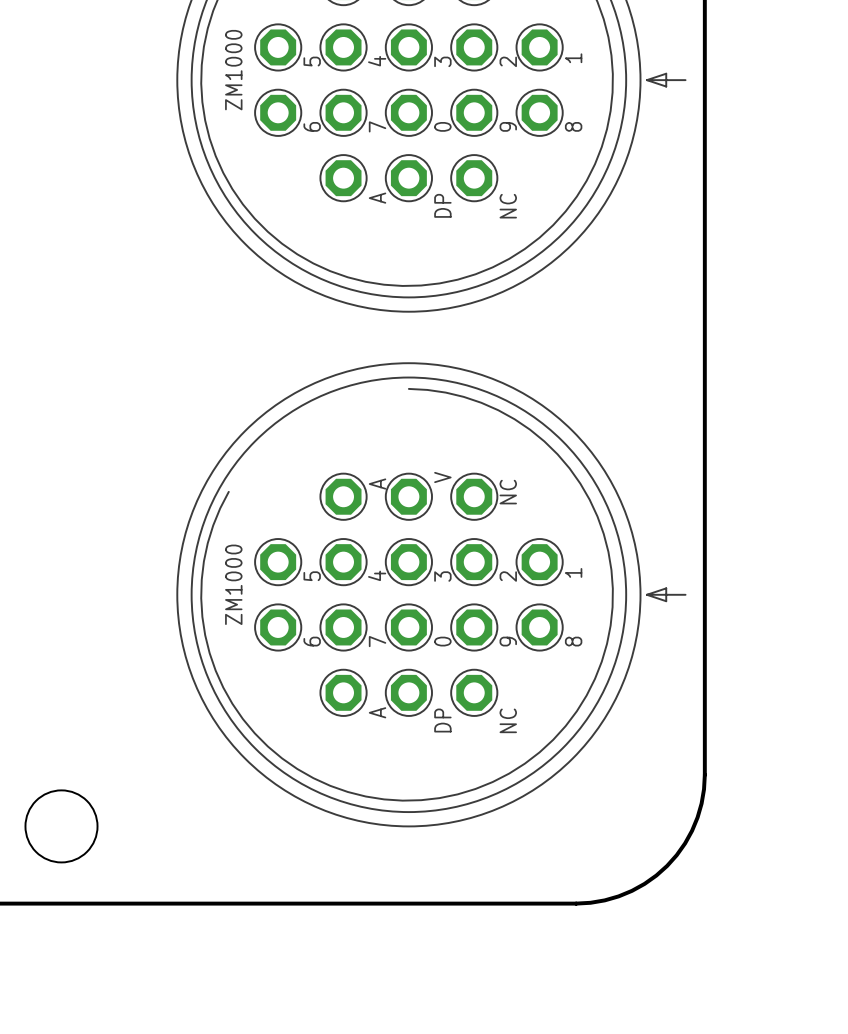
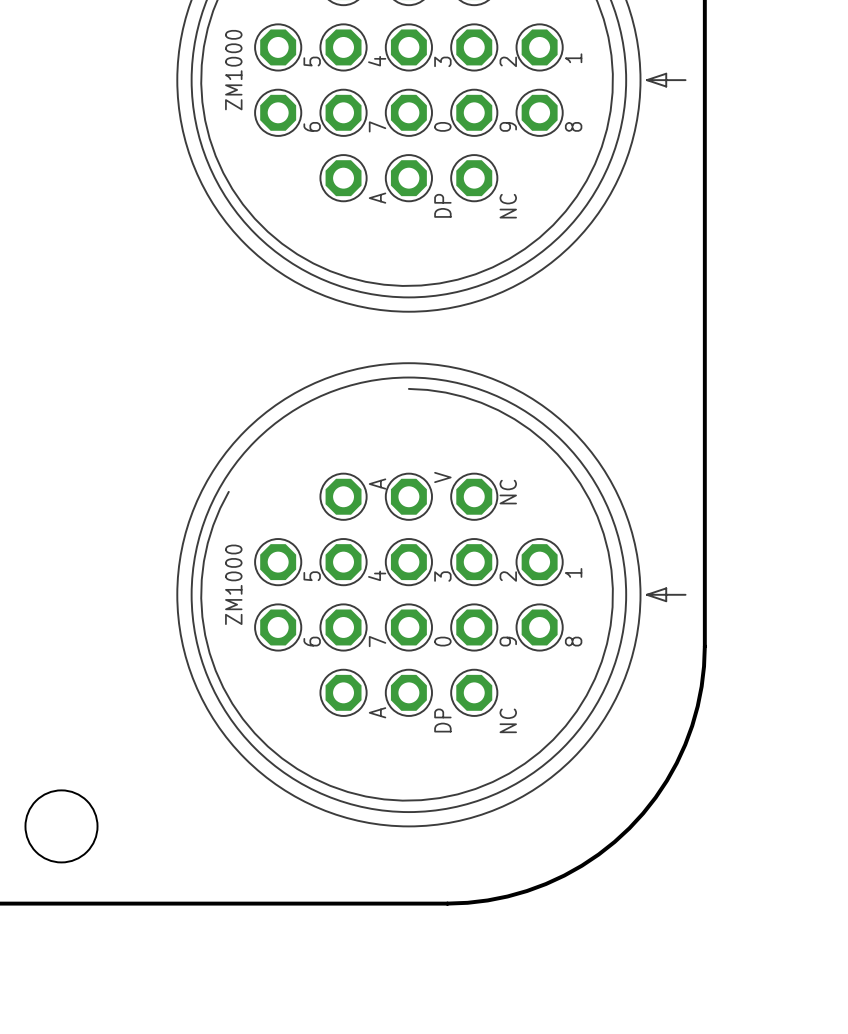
board edge: (704, 646) (704, 774) (701, 803) (697, 817) (685, 843) (667, 865) (644, 883) (618, 896) (604, 900) (576, 903) (447, 903) -> (704, 646) (704, 666) (697, 706) (685, 744) (676, 763) (655, 797) (629, 828) (598, 854) (564, 875) (545, 884) (507, 896) (467, 902) (447, 903)

